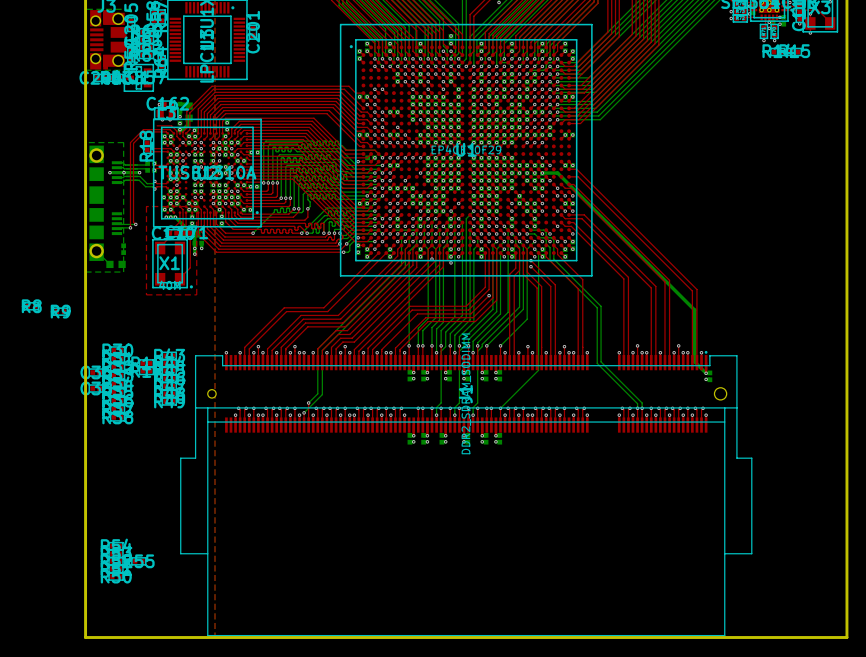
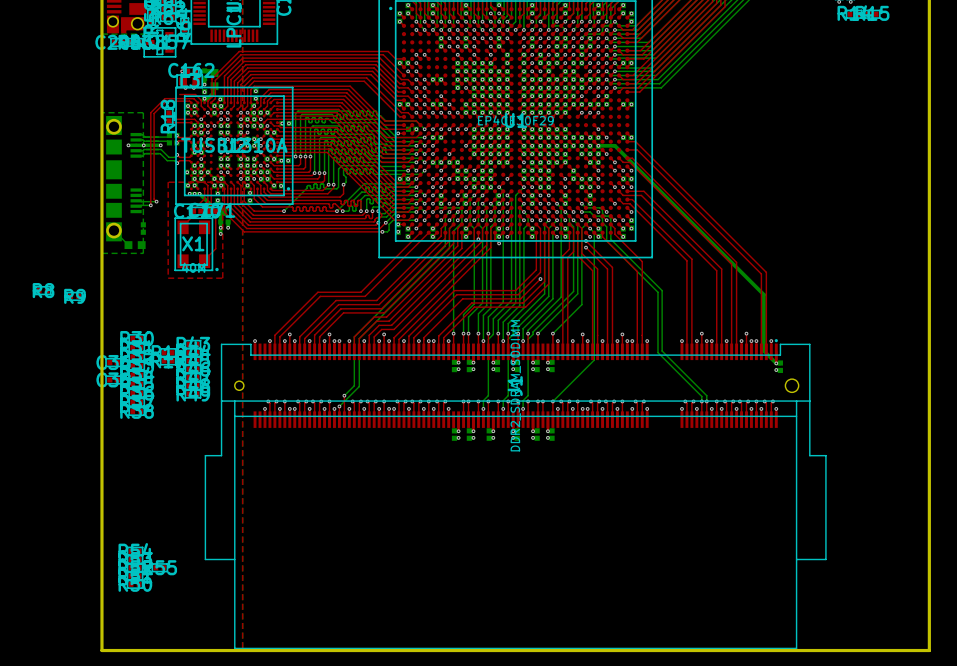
top track: (534, 127) (530, 131) -> none
via: (534, 127) -> none

